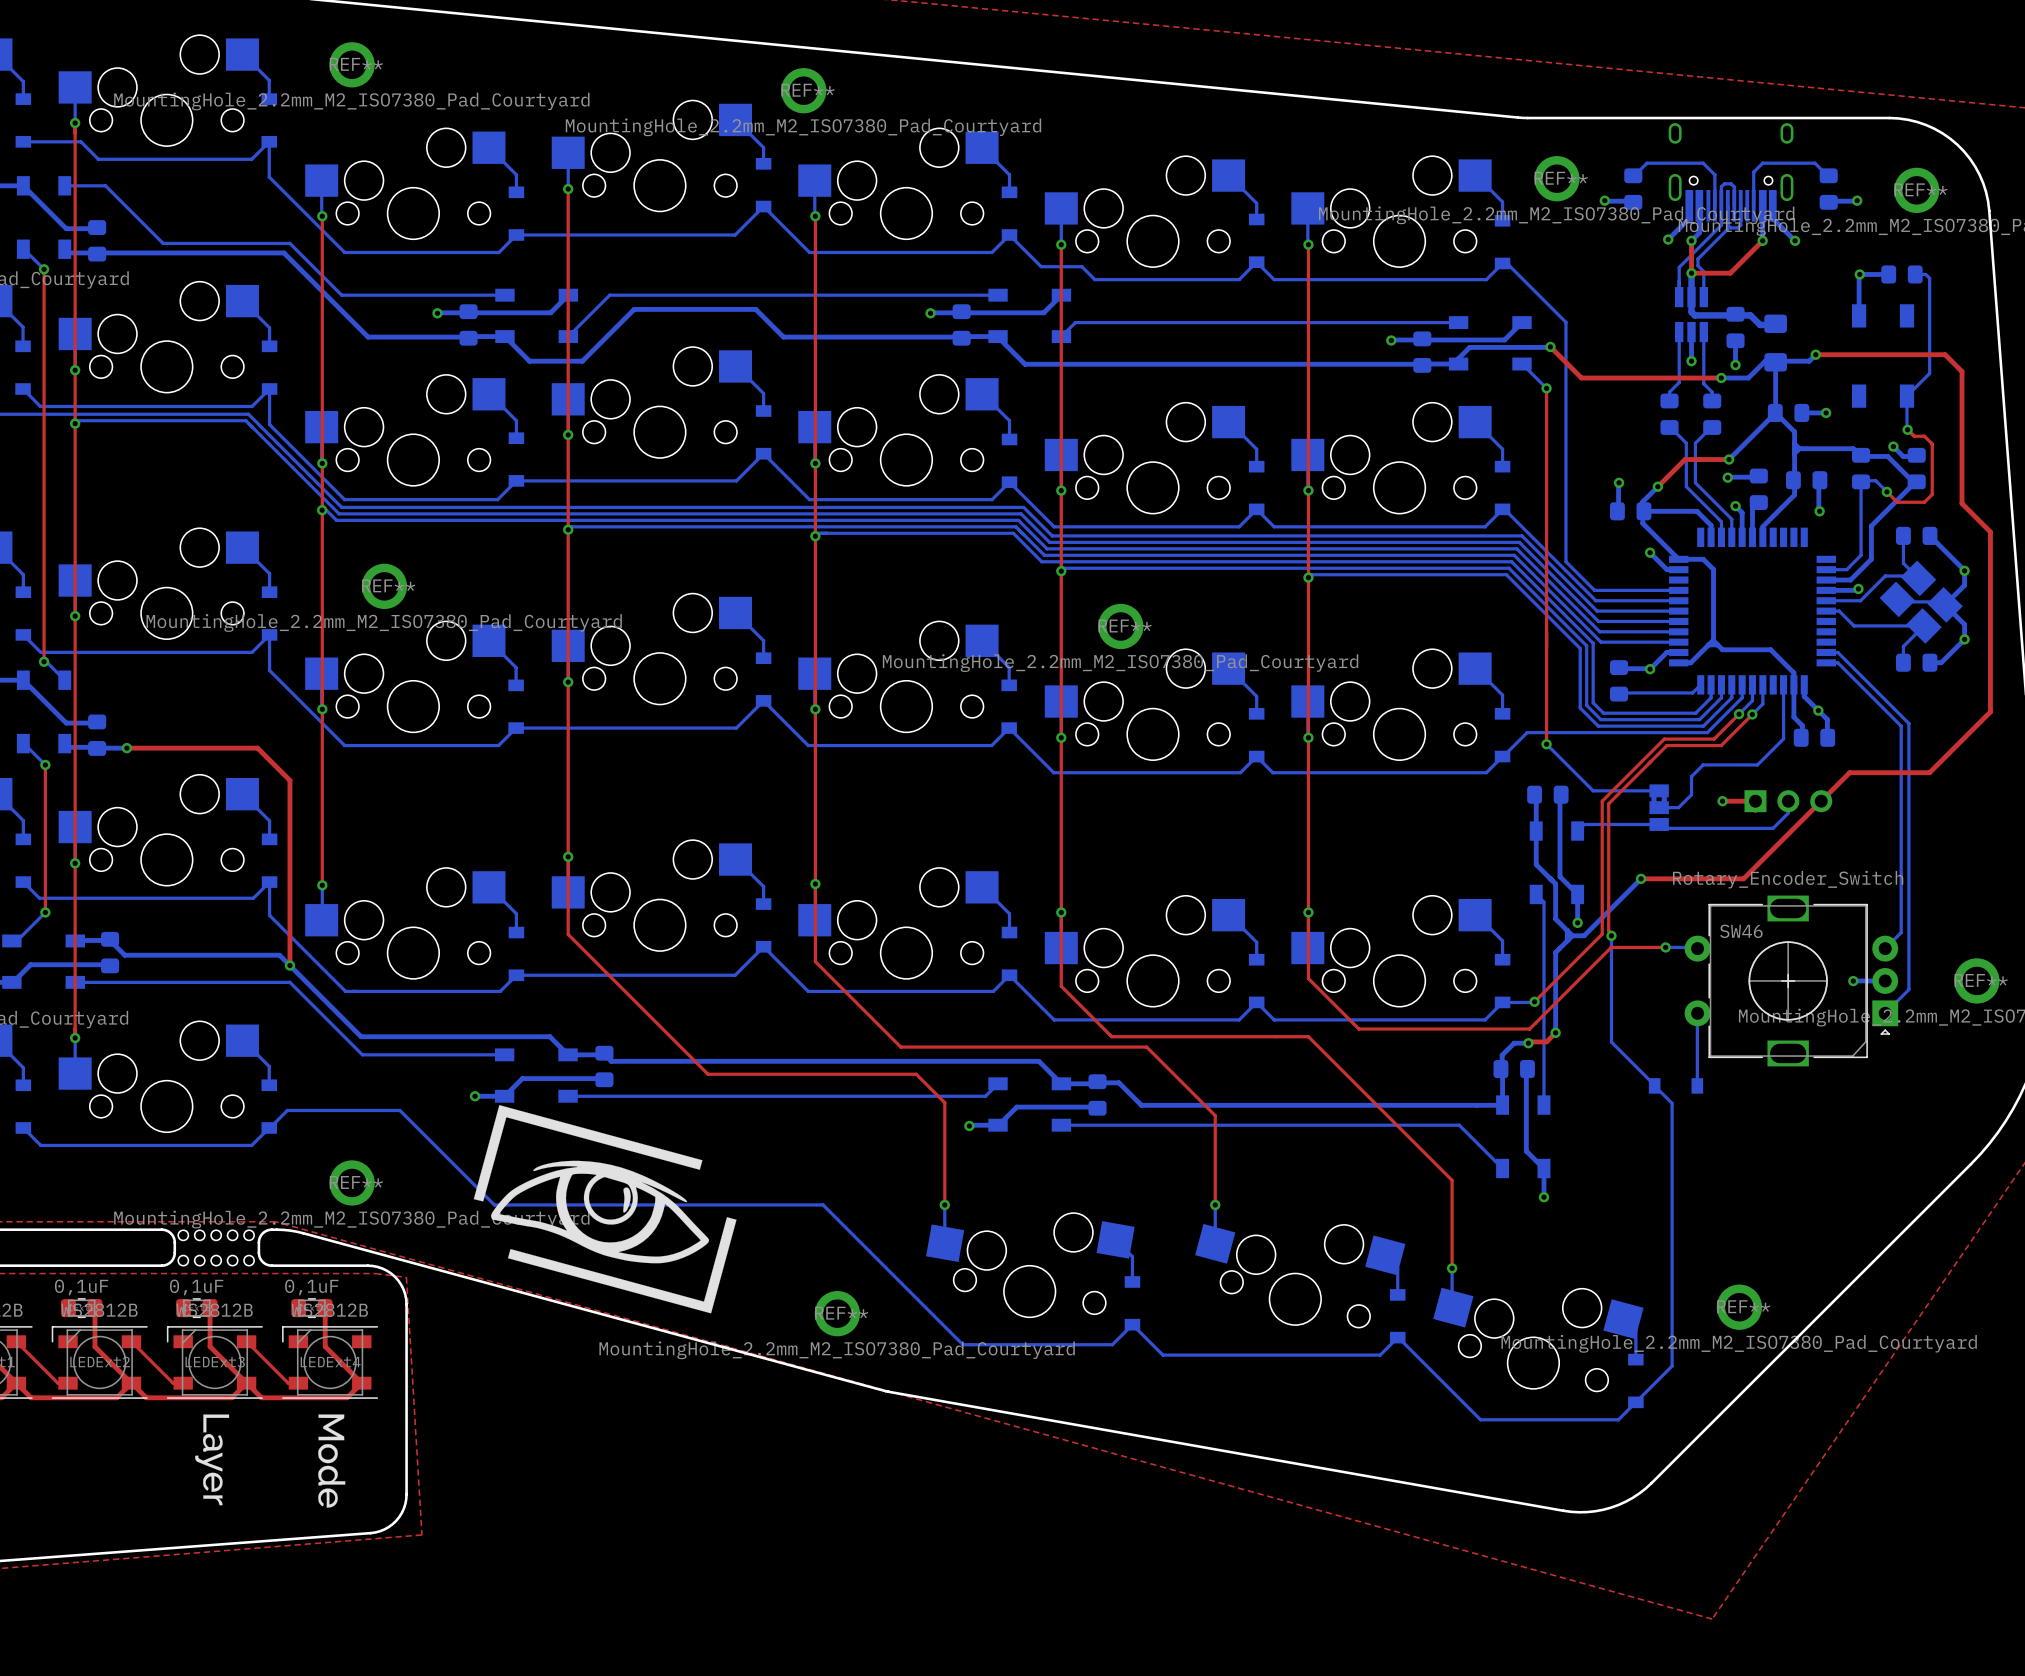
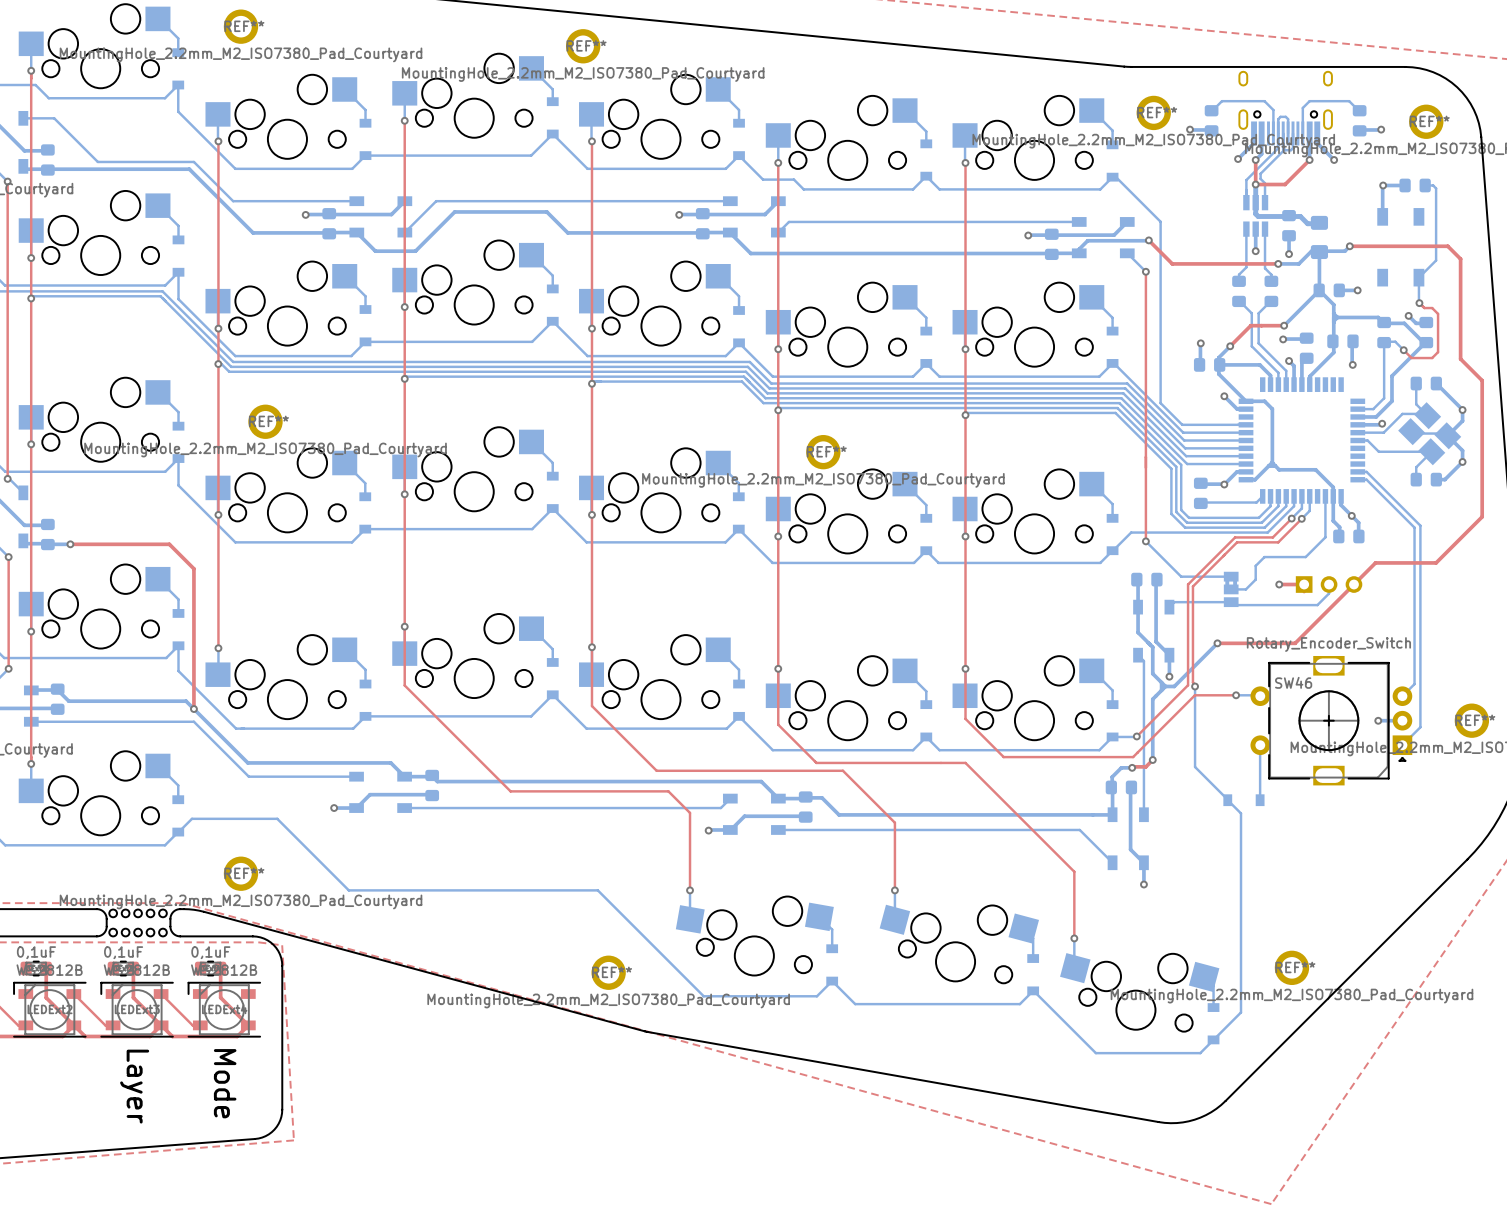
drawing: [473, 1105, 737, 1314] -> none
drawing: [195, 1414, 230, 1506] -> none
drawing: [318, 1414, 346, 1508] -> none
text: none -> Mode (225, 1083)
text: none -> Layer (134, 1086)

